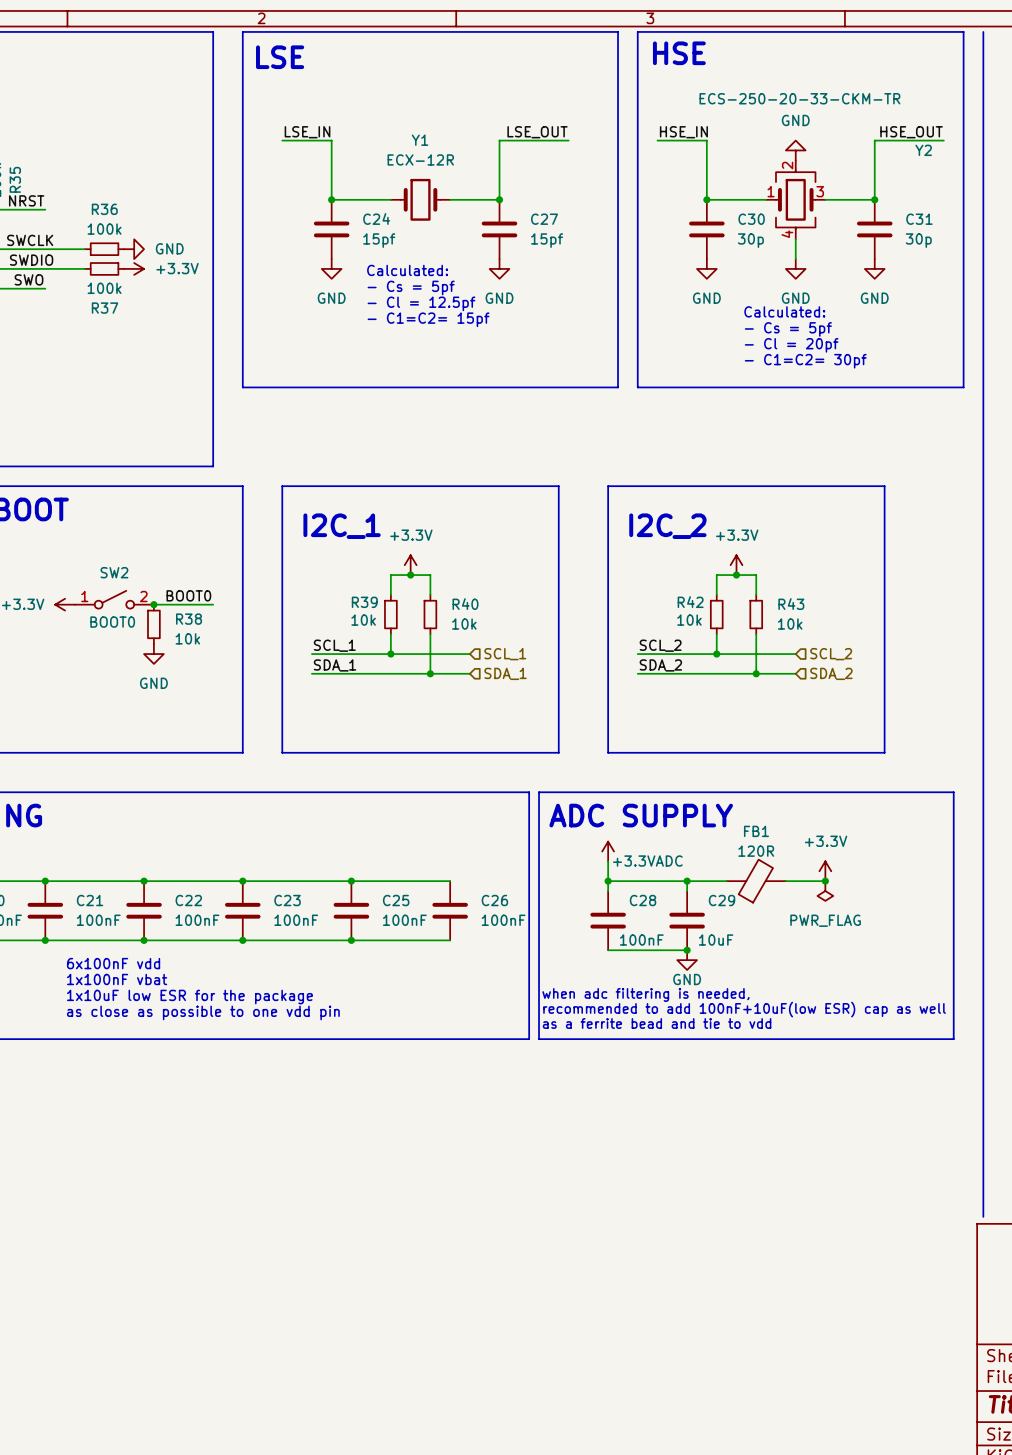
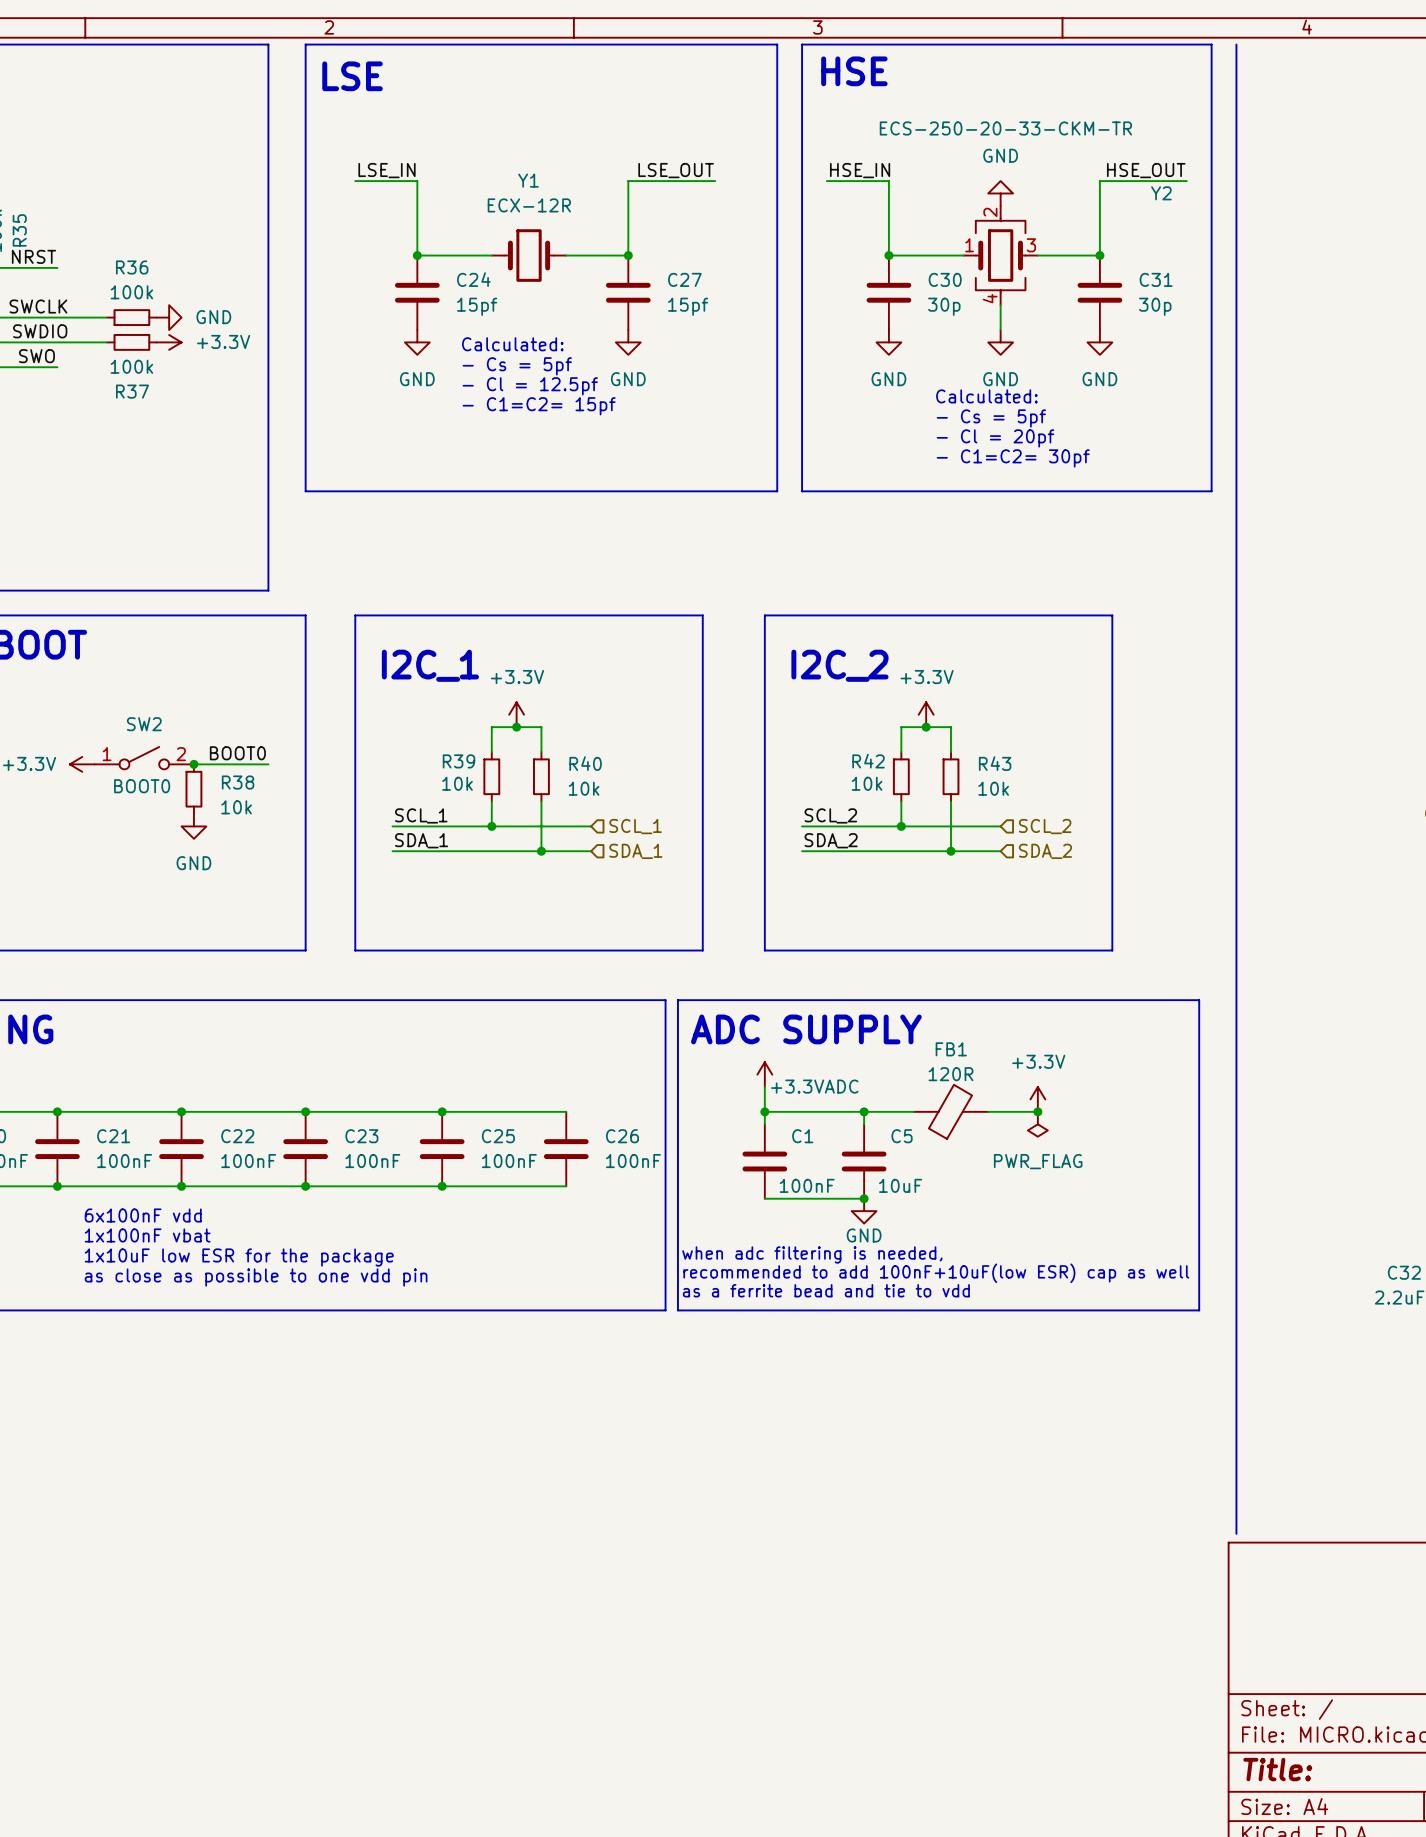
C28 name: C28 (643, 900) -> C1 (802, 1136)
C29 name: C29 (721, 900) -> C5 (902, 1136)

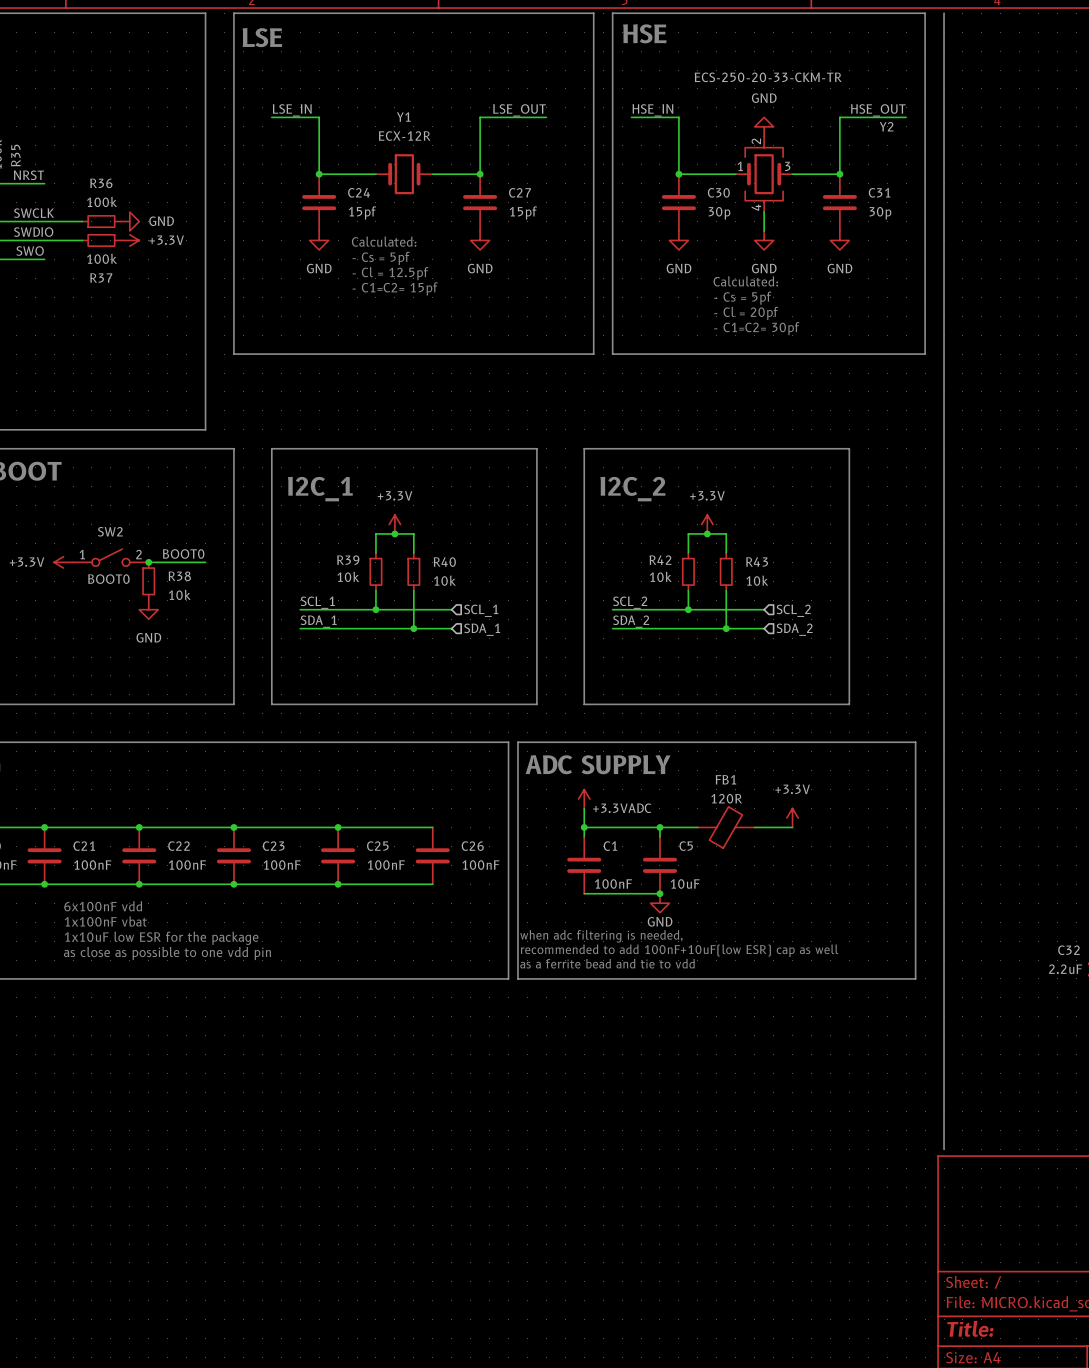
junction: (1037, 1111) -> none
power symbol: PWR_FLAG (1037, 1124) -> none

